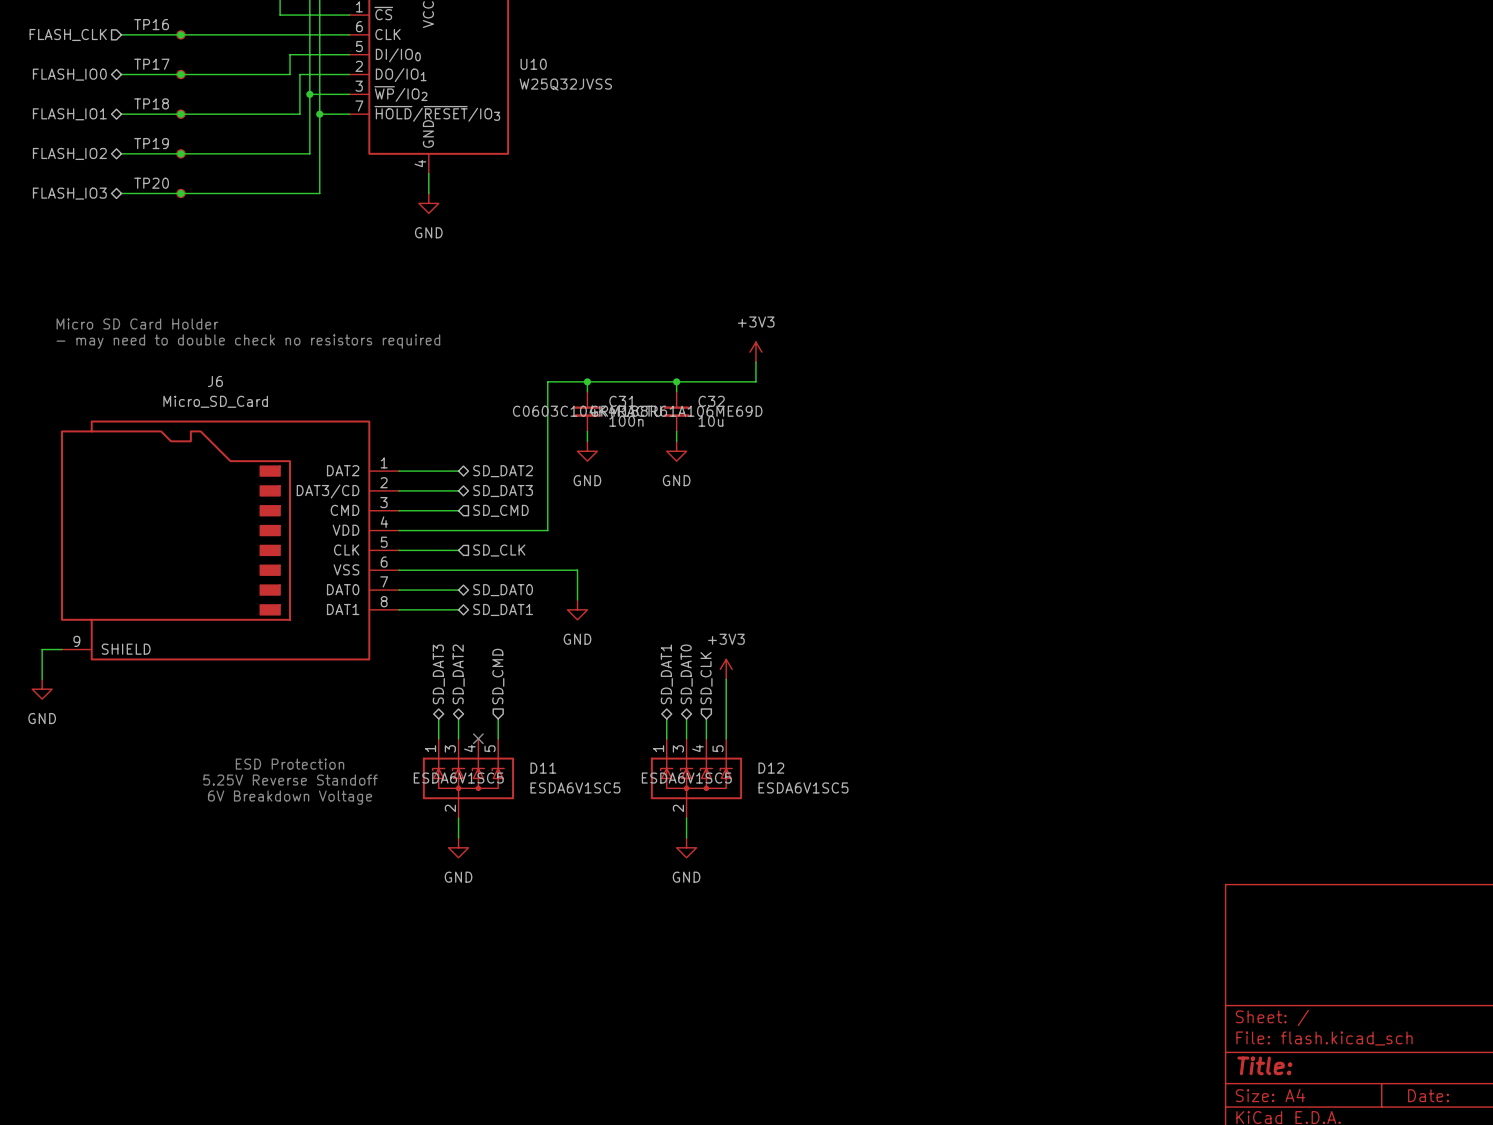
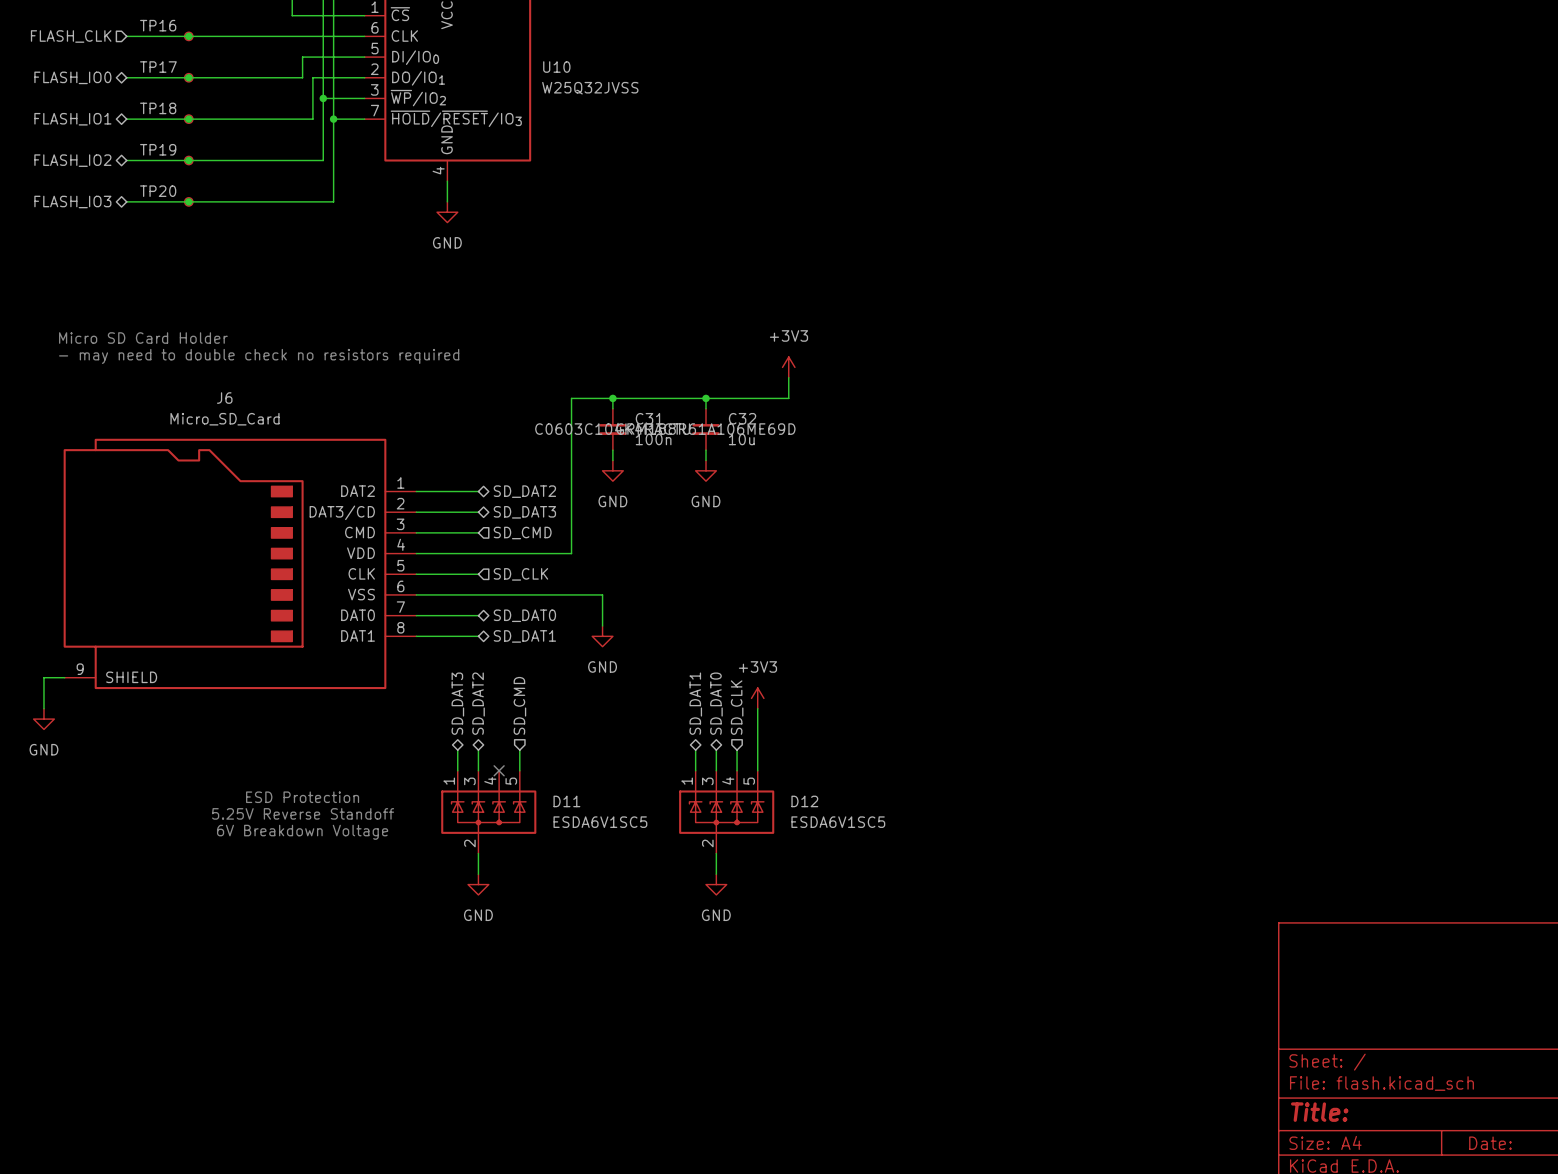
D11 text: ESDA6V1SC5 (458, 778) -> none
D12 text: ESDA6V1SC5 (686, 778) -> none

